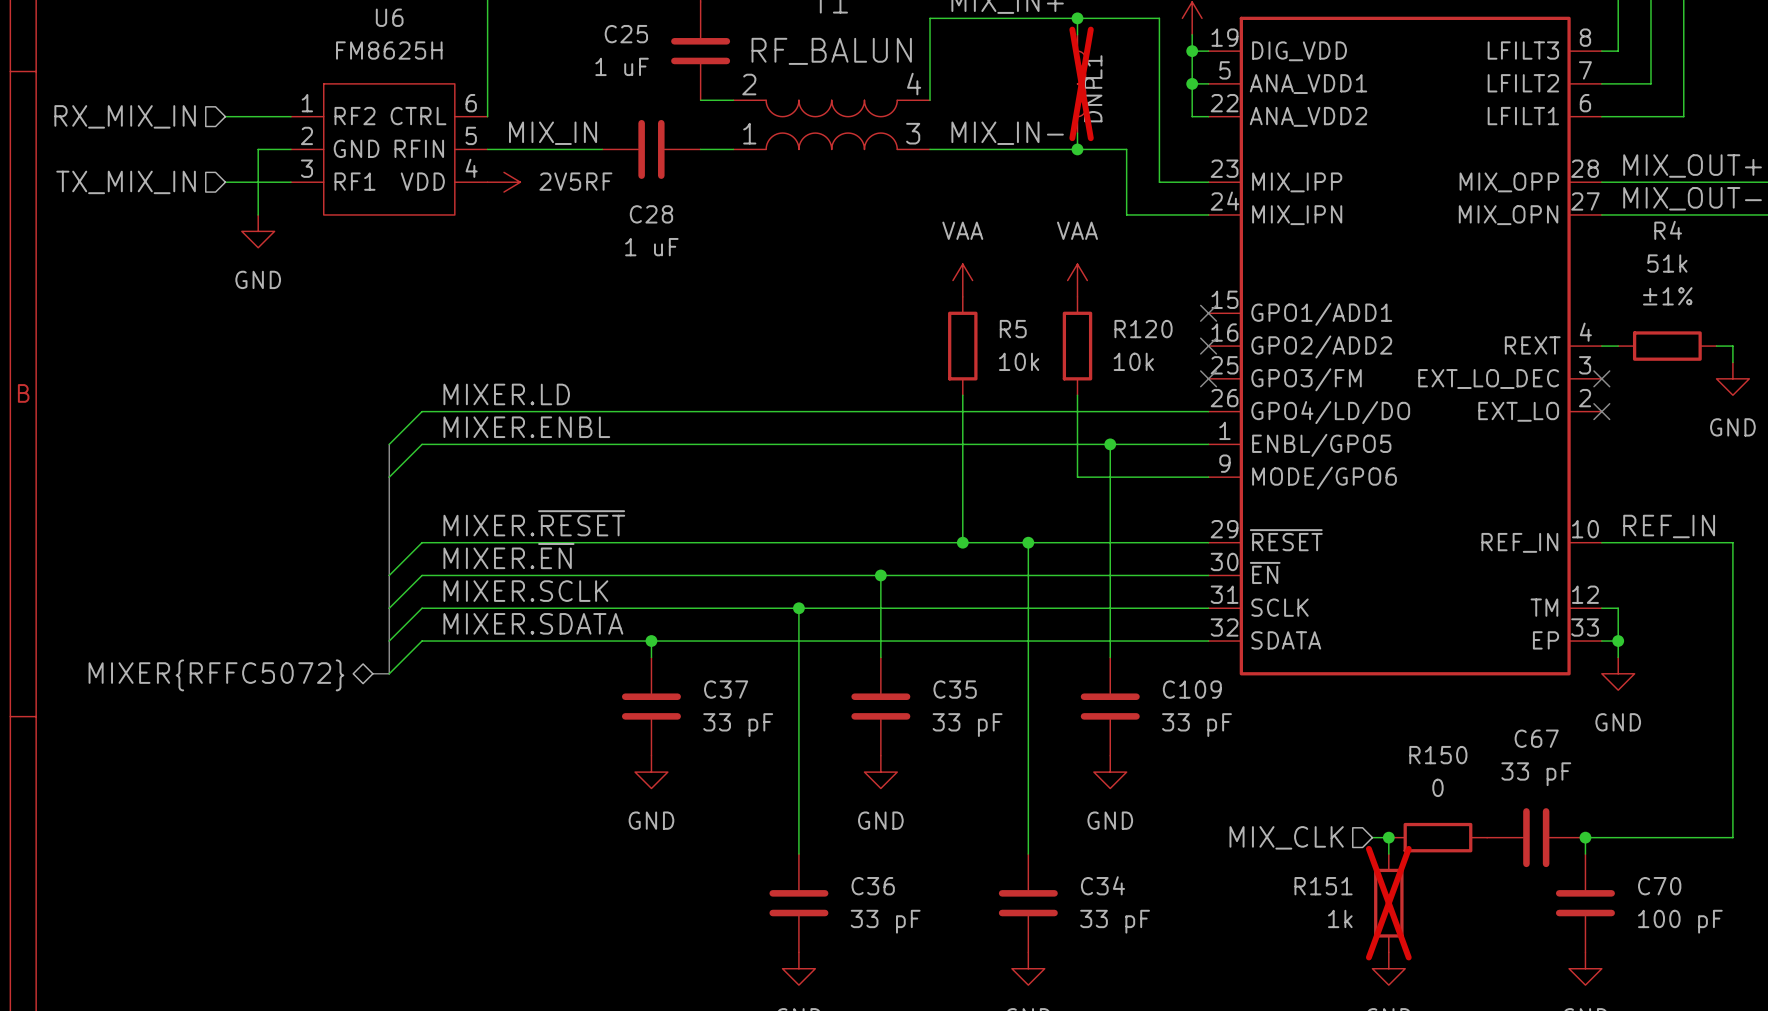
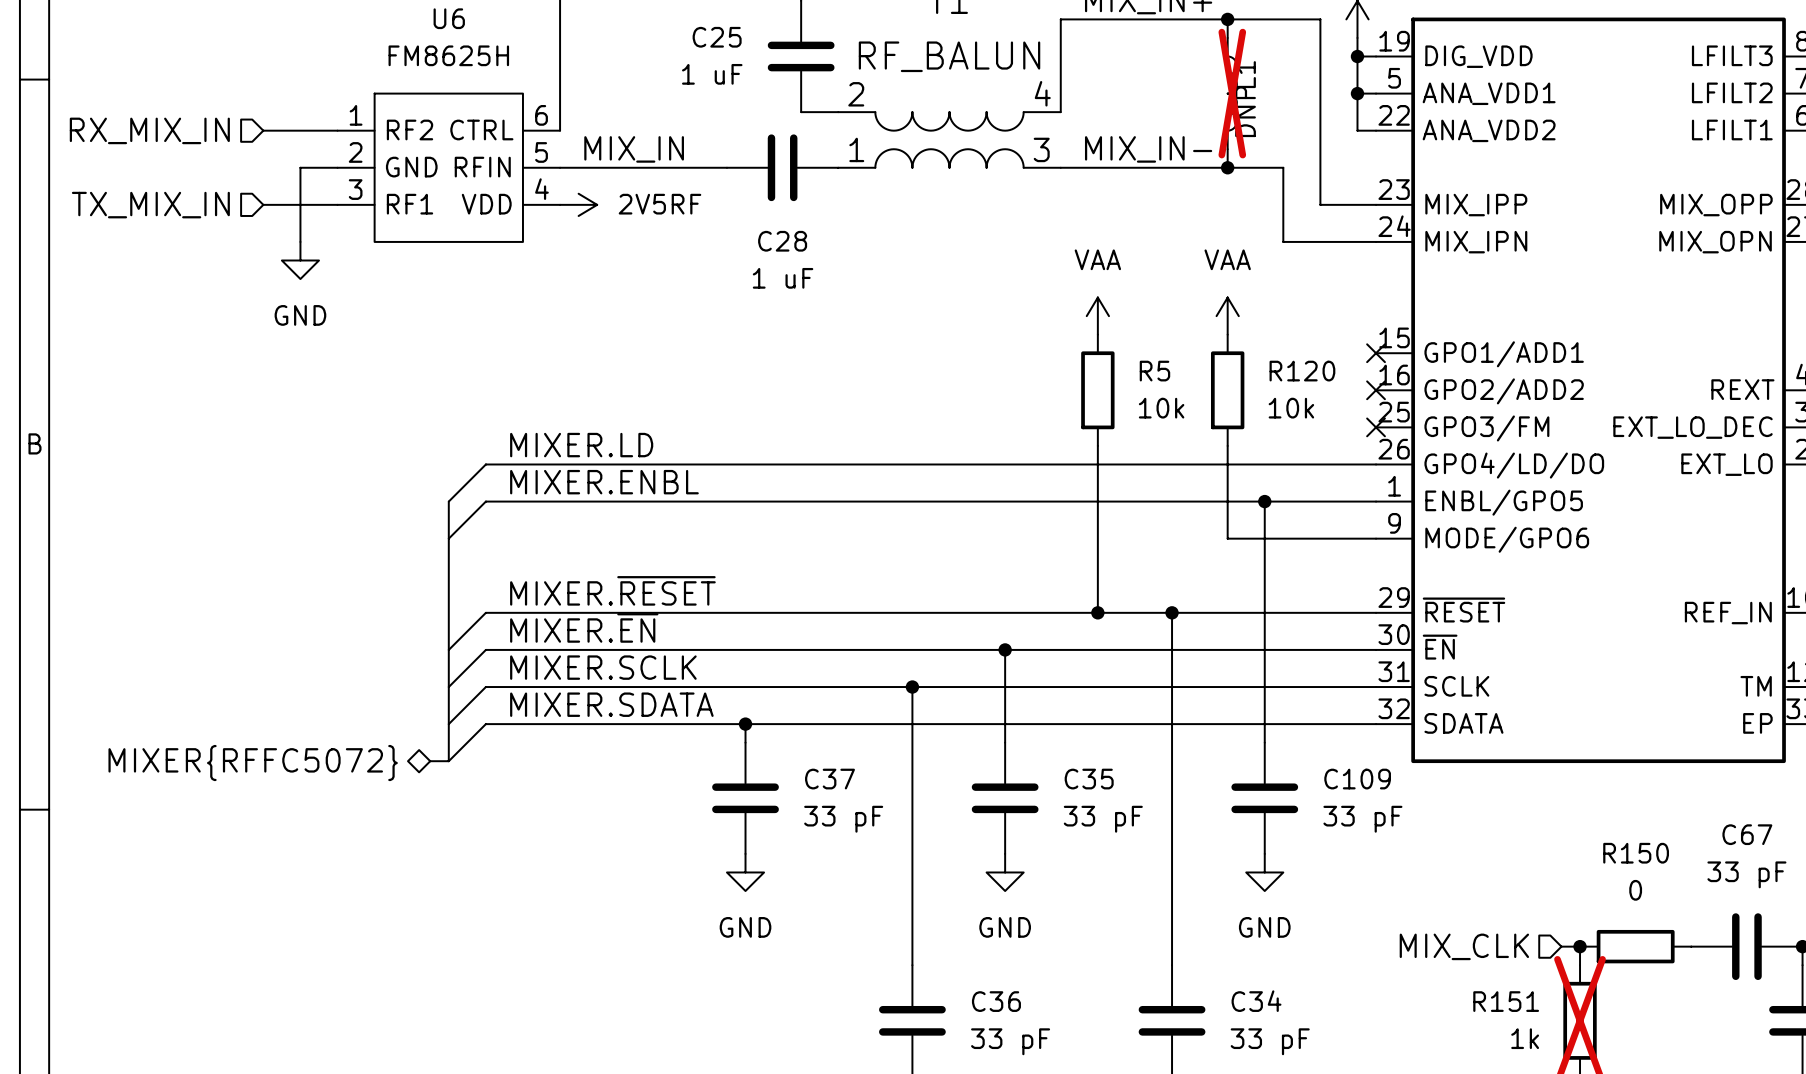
C28 position: (651, 149) -> (782, 167)

